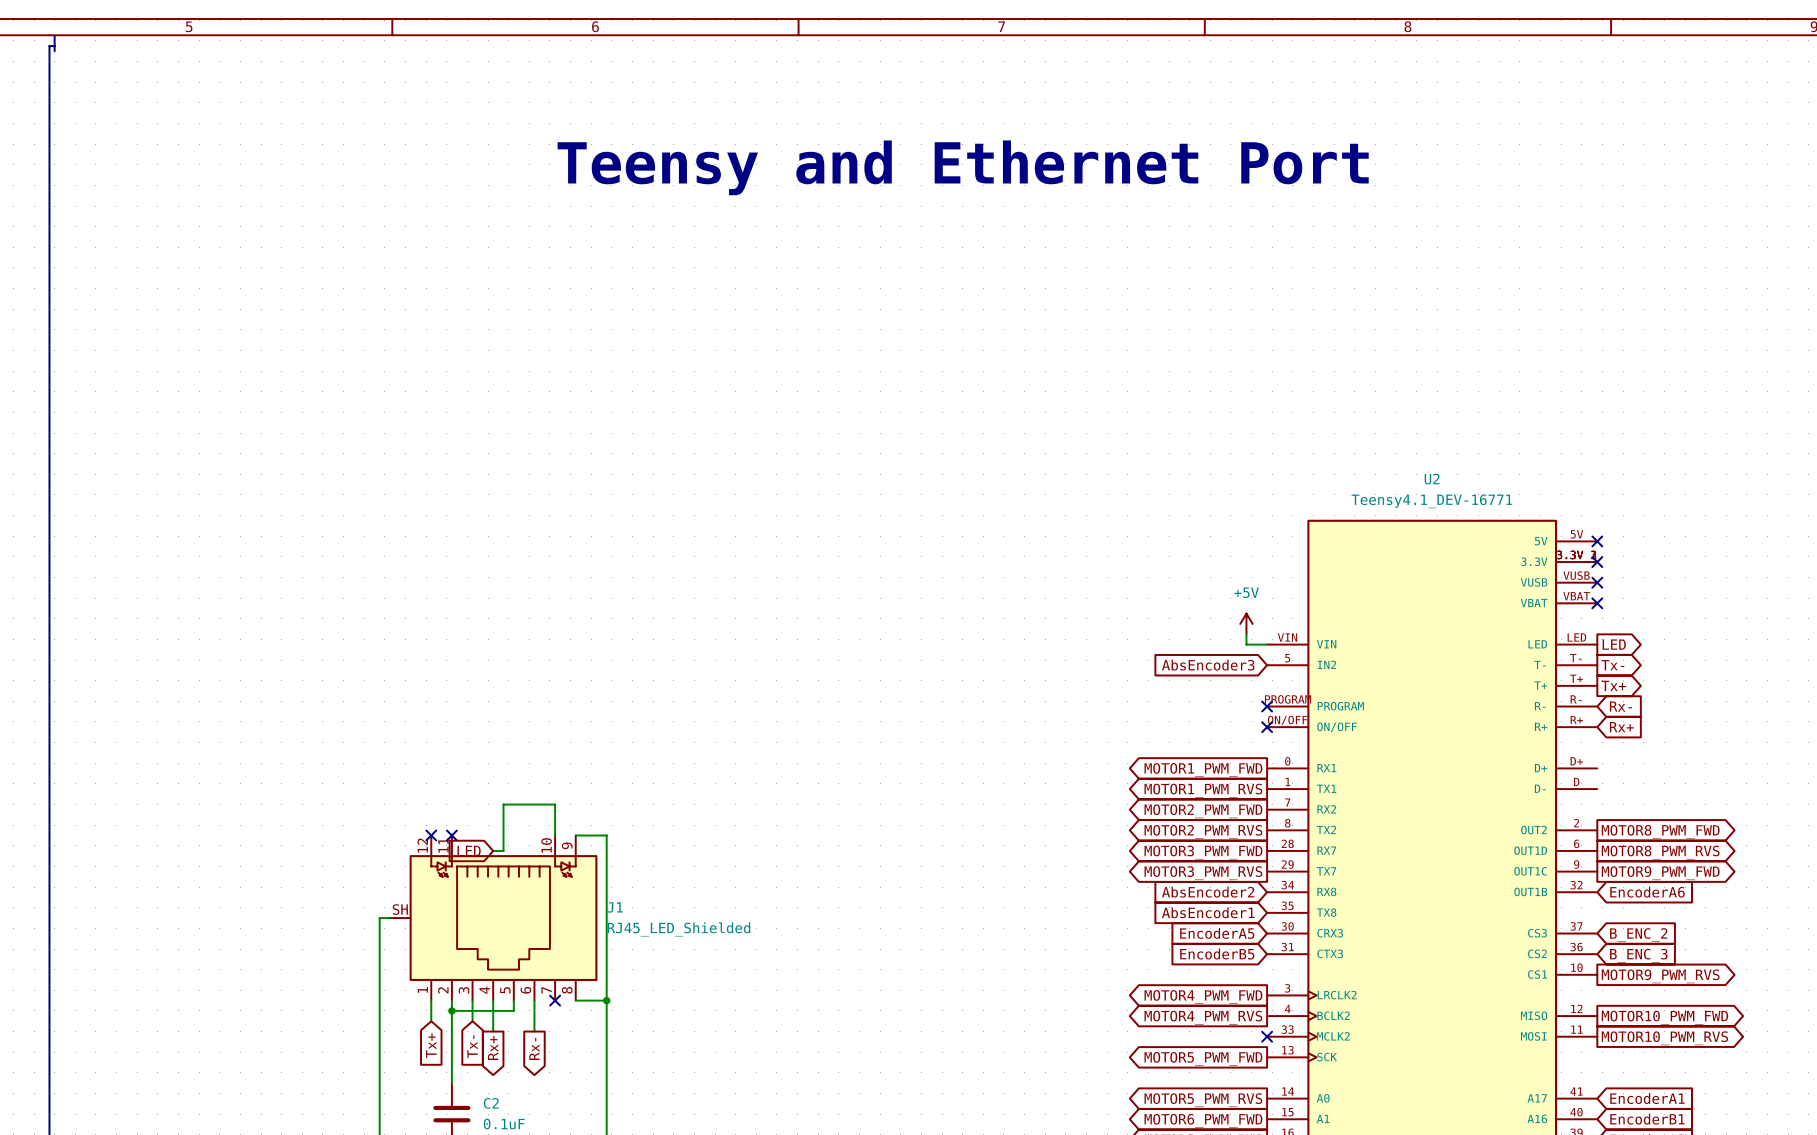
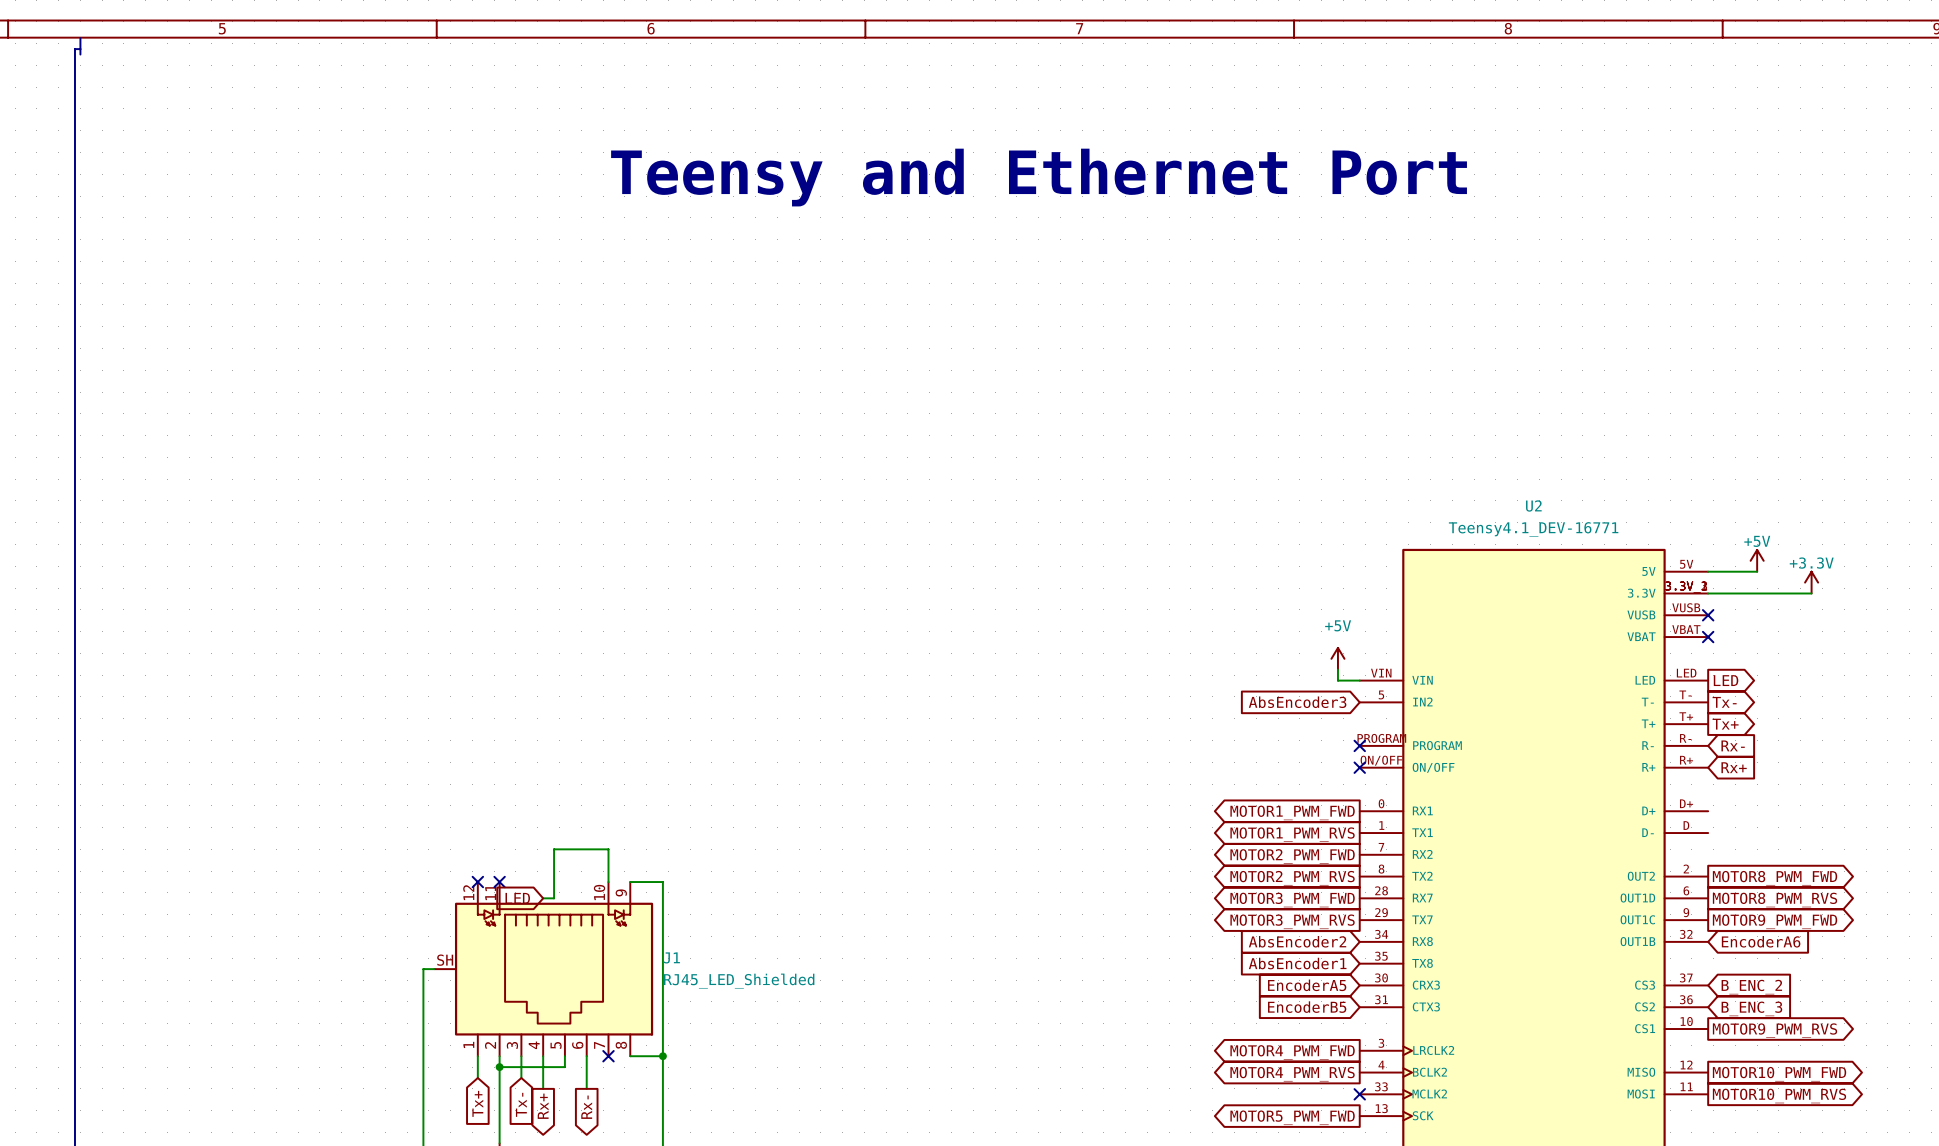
power symbol: none -> +5V (1757, 560)
wire: none -> (1708, 571) (1757, 571)
no-connect mark: (1597, 541) -> none
power symbol: none -> +3.3V (1811, 582)
wire: none -> (1708, 593) (1811, 593)
no-connect mark: (1597, 562) -> none

